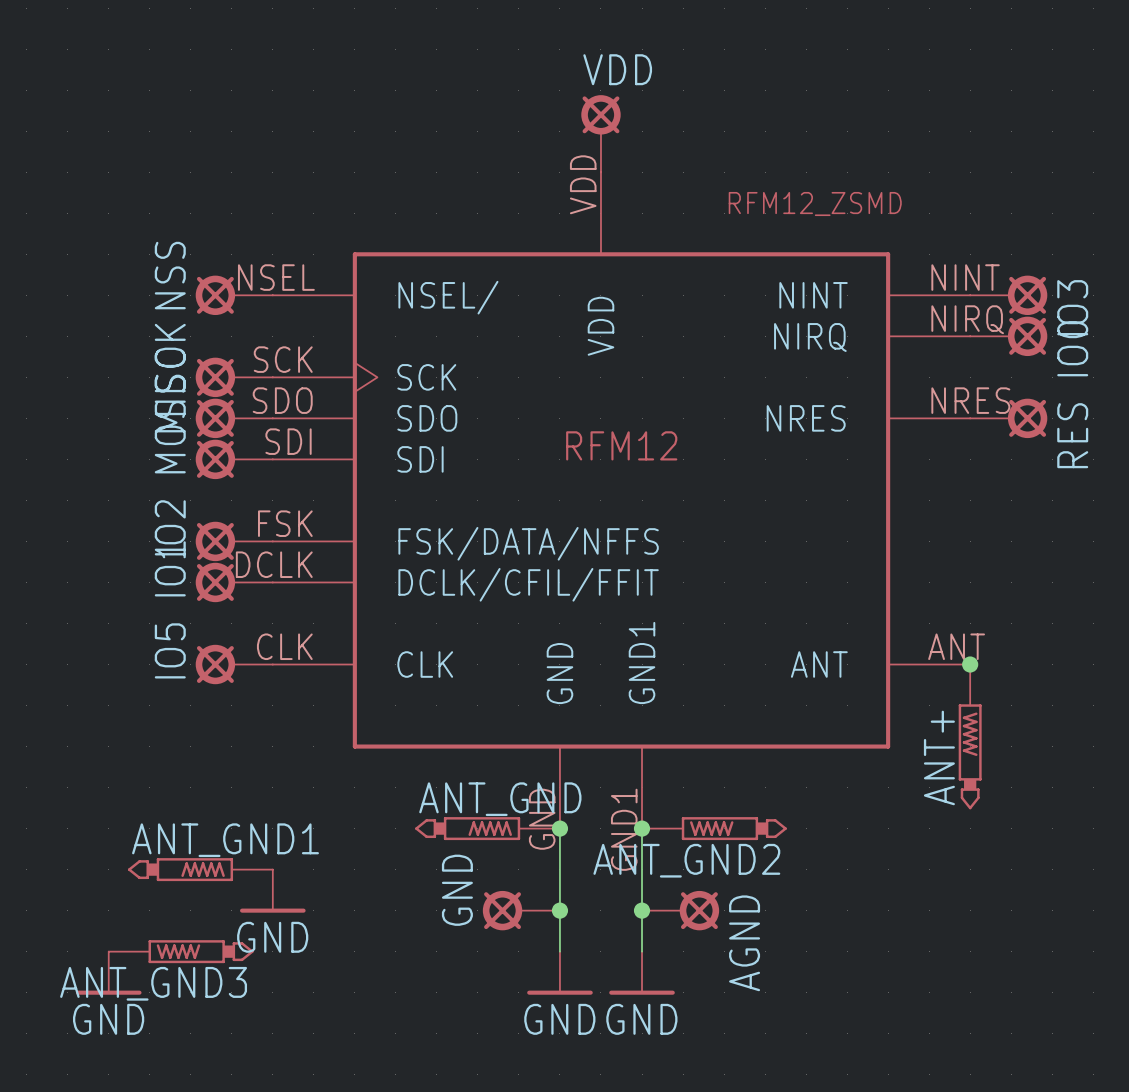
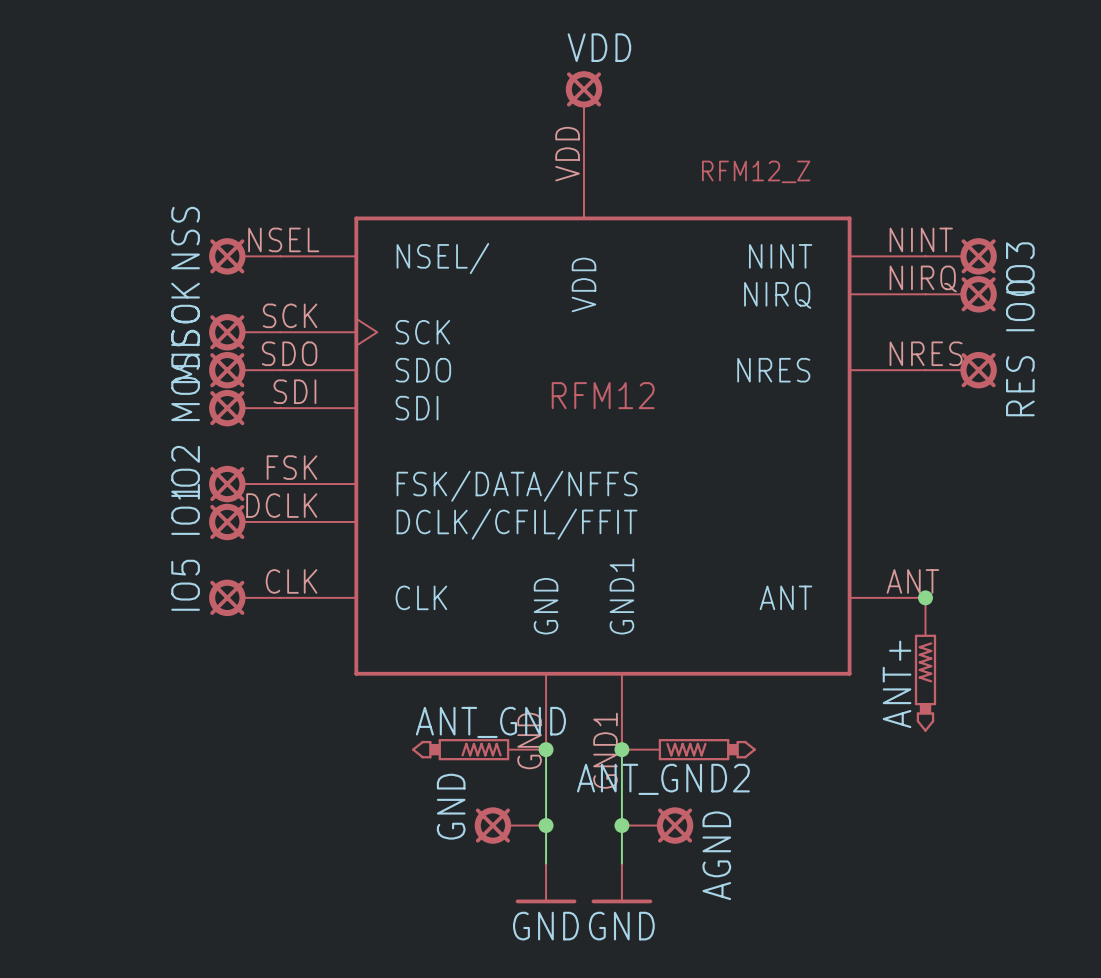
part value: RFM12_ZSMD (815, 204) -> RFM12_Z (756, 171)
ANT_GND1: (200, 869) -> none
power symbol: GND (272, 891) -> none
ANT_GND3: (181, 951) -> none
power symbol: GND (108, 973) -> none

